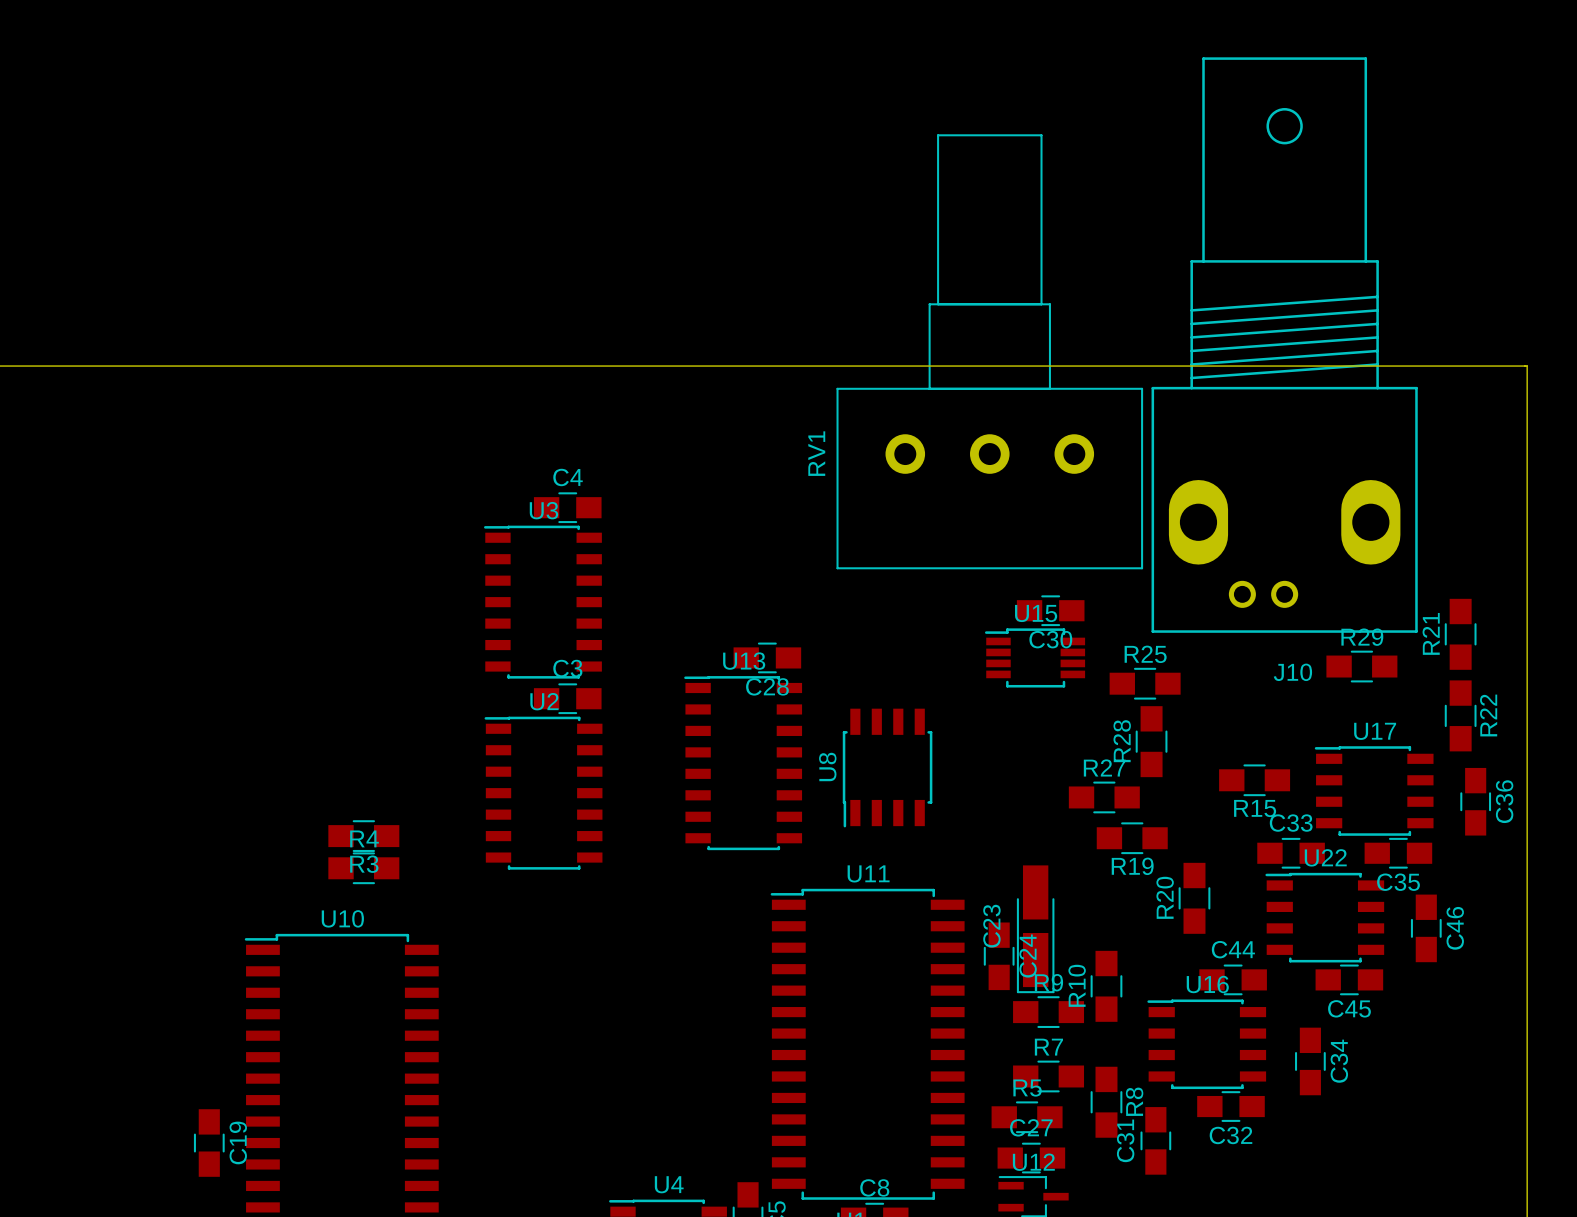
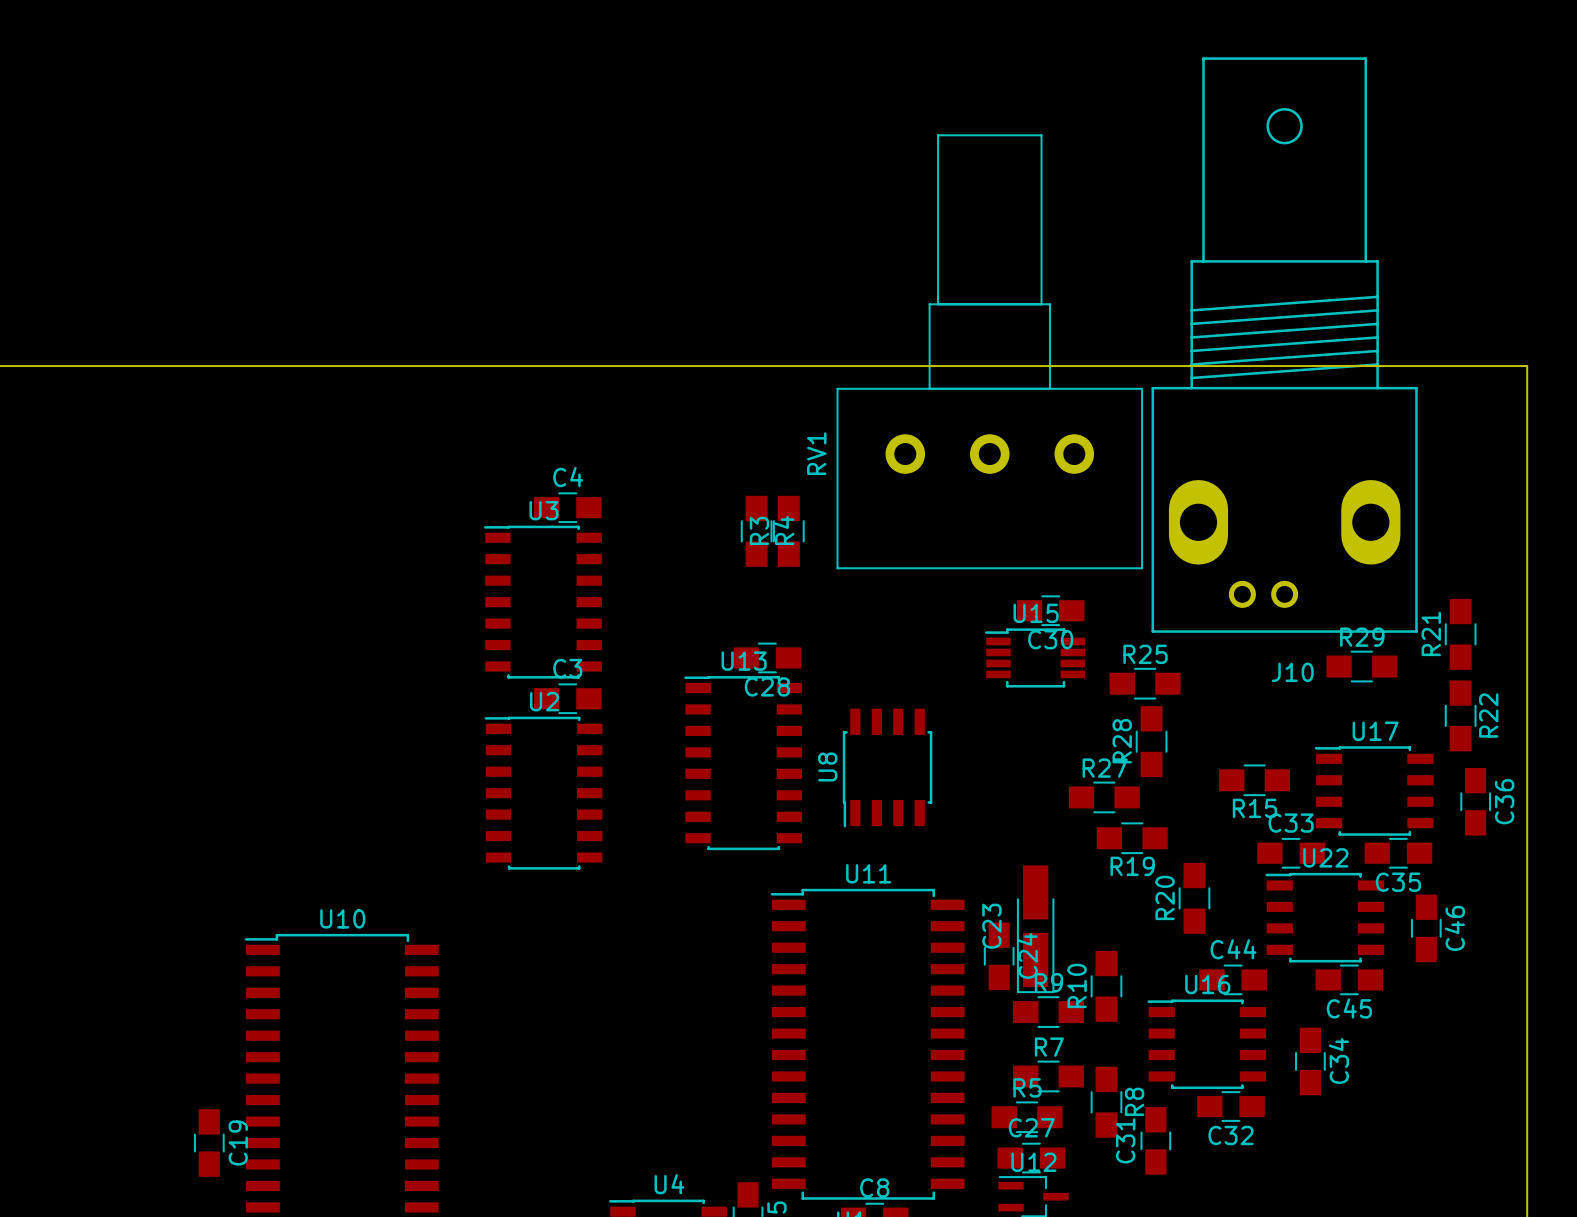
R3 rotation: 0° (363, 836) -> 90° clockwise (788, 531)
R3 position: (363, 836) -> (788, 531)
R4 rotation: 0° (363, 868) -> 90° clockwise (756, 531)
R4 position: (363, 868) -> (756, 531)

